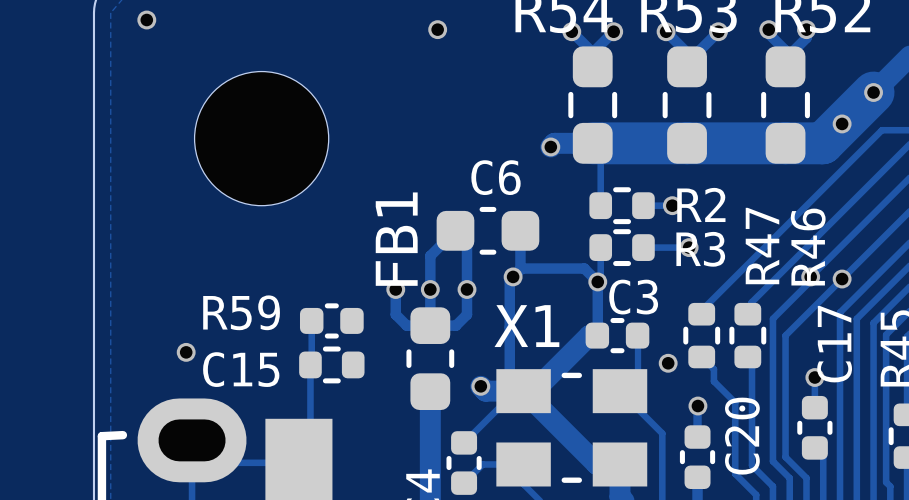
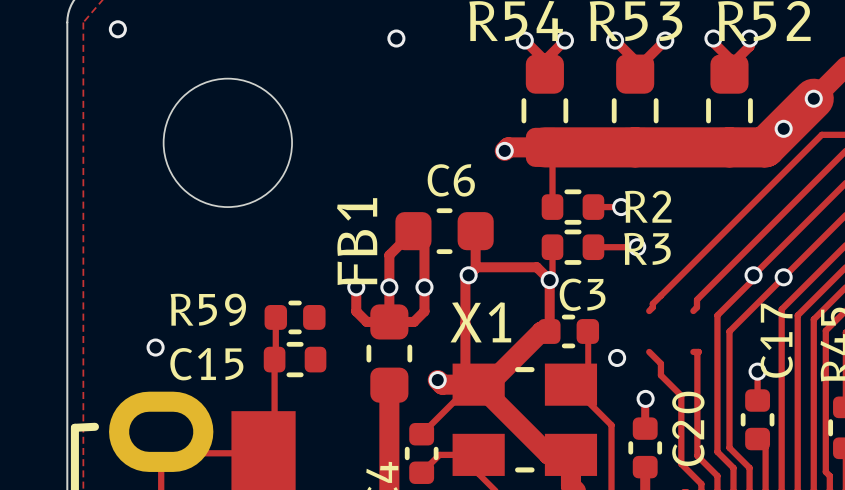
R47: (701, 335) -> none
R46: (747, 335) -> none

